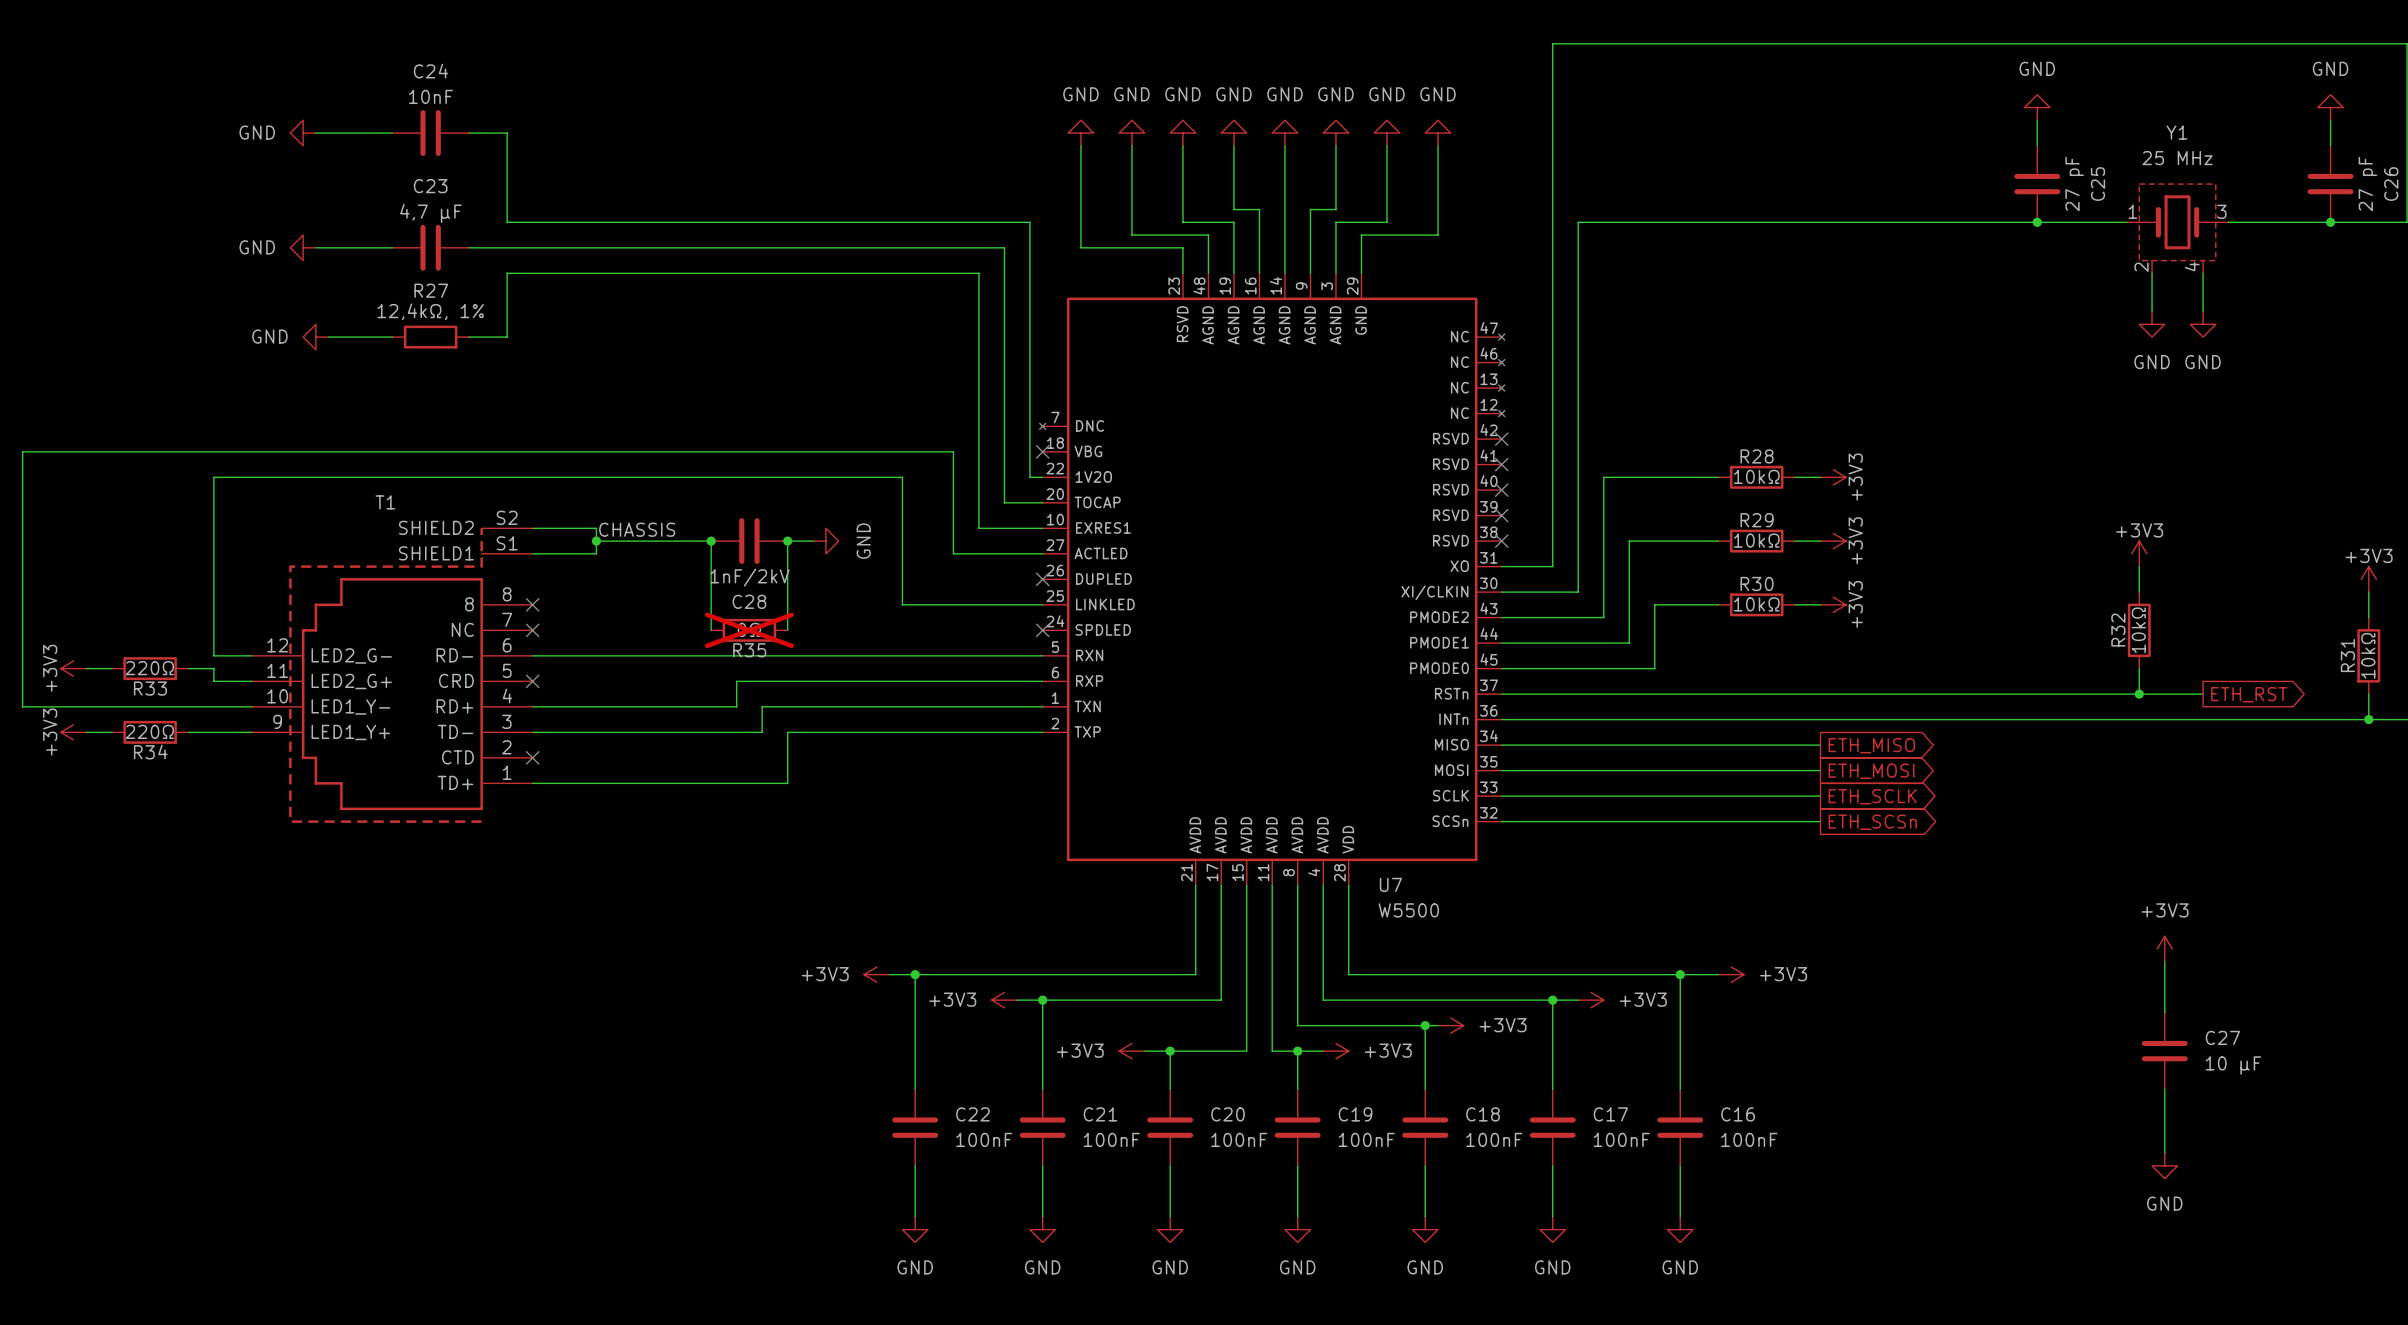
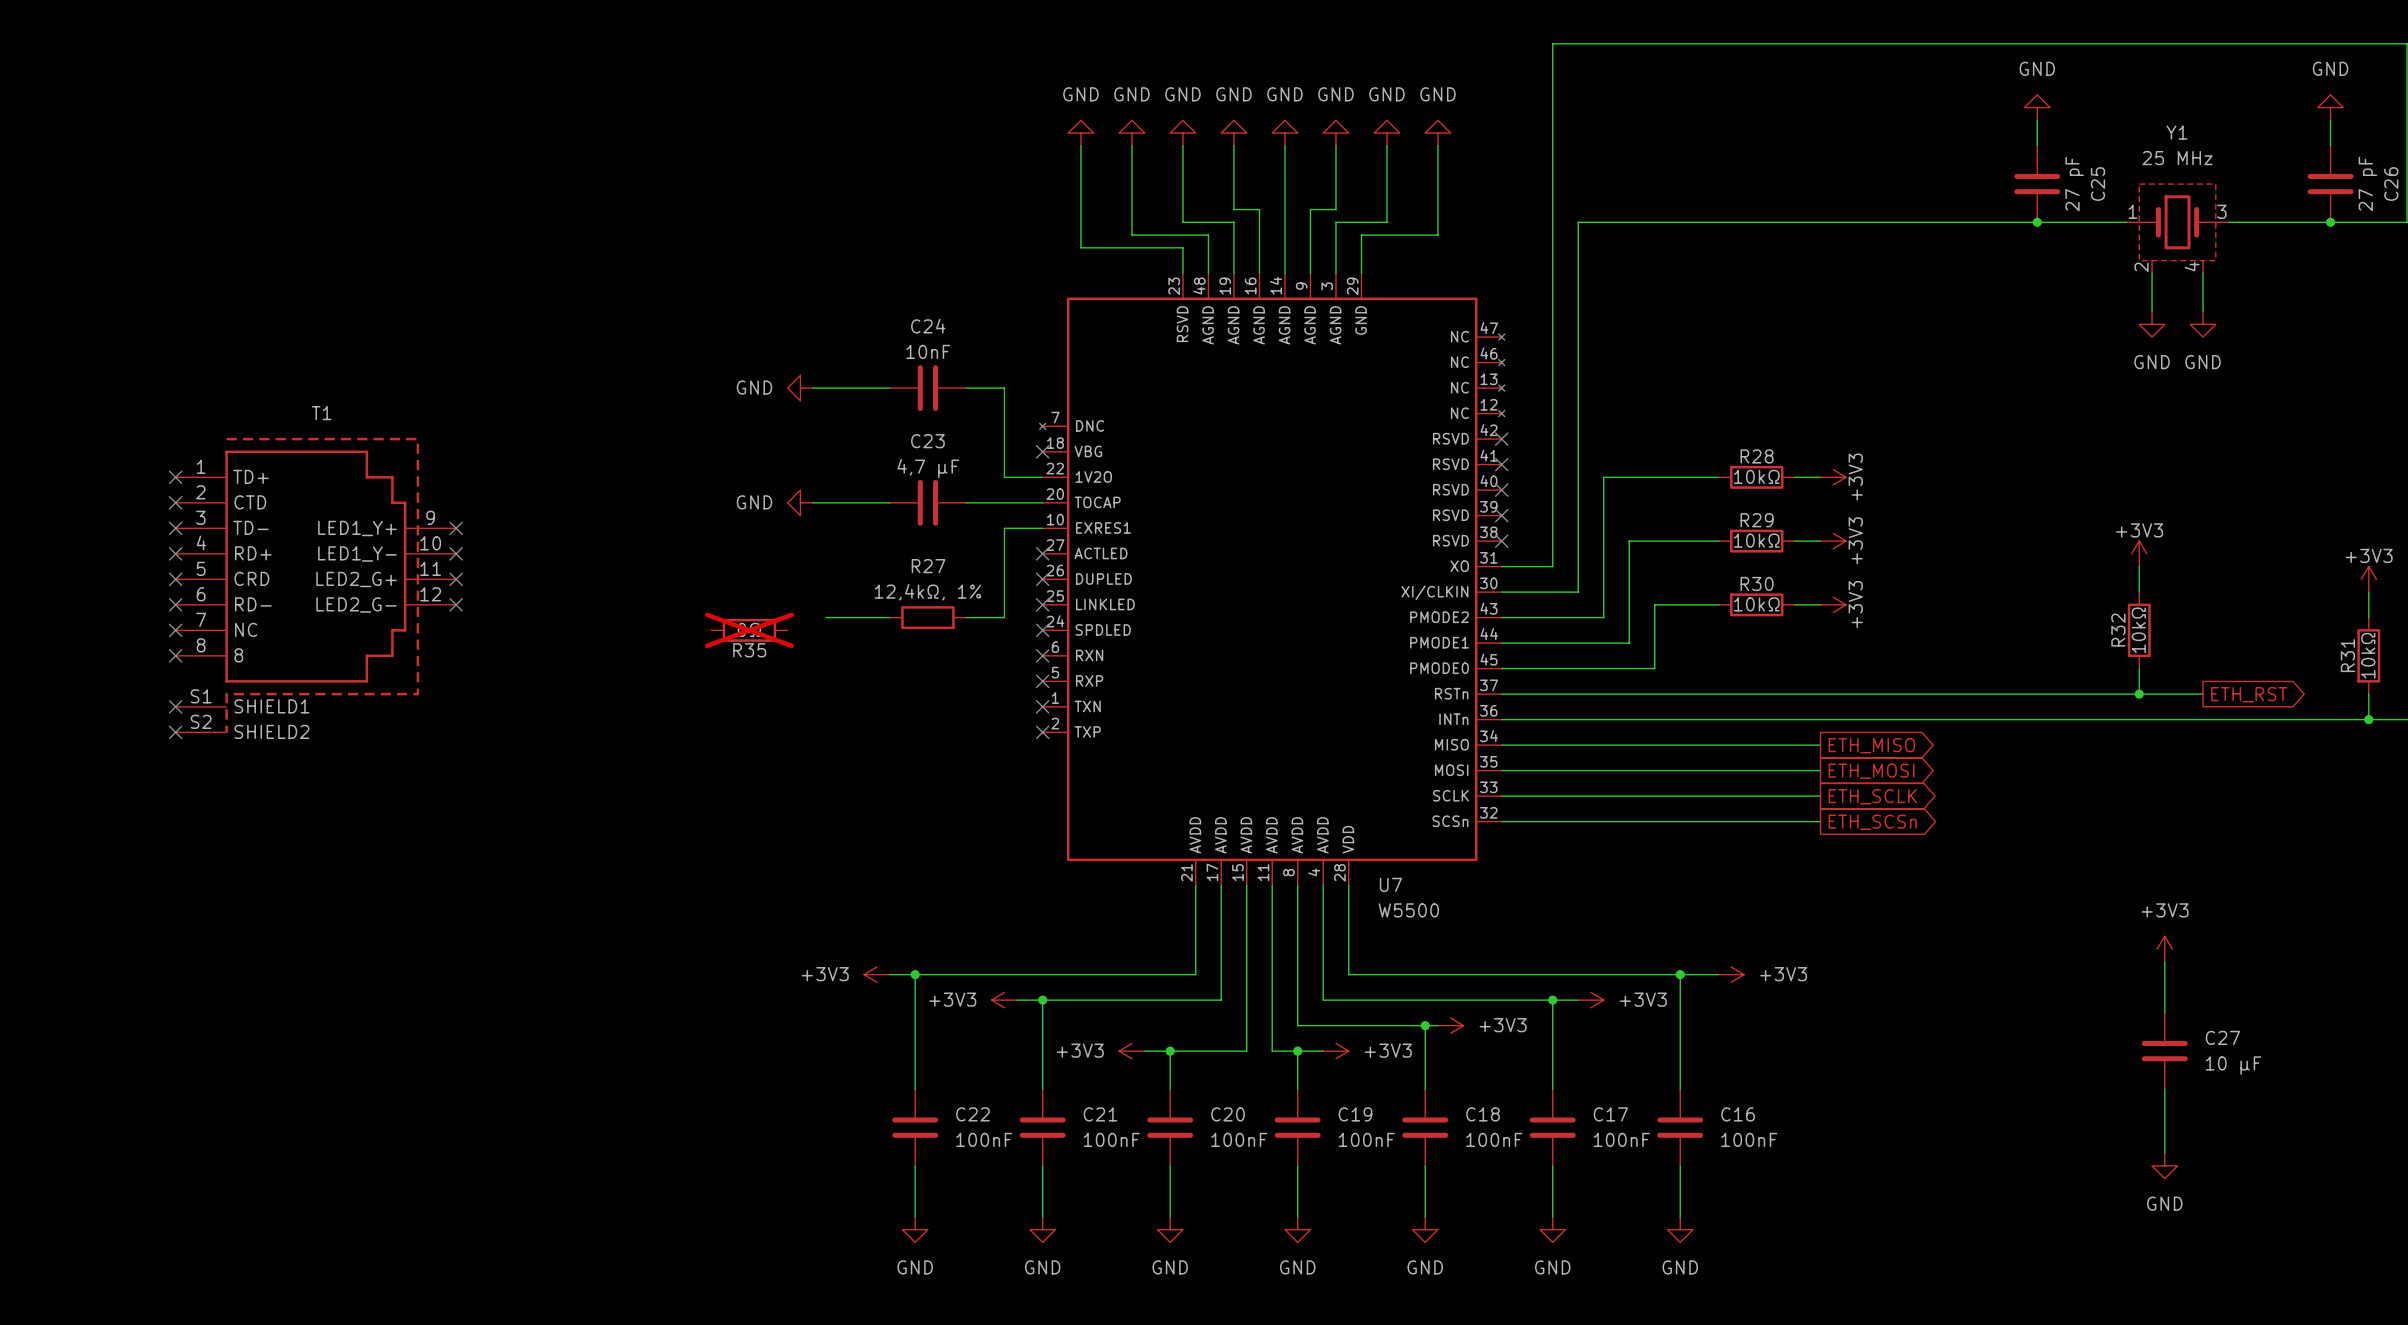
power symbol: GND (303, 133) -> none
wire: (315, 133) (392, 133) -> none
C24 position: (430, 133) -> (927, 388)
wire: (468, 133) (507, 133) (507, 222) (1029, 222) (1029, 477) -> none
power symbol: GND (303, 247) -> none
wire: (315, 247) (392, 247) -> none
C23 position: (430, 247) -> (927, 502)
wire: (468, 247) (1004, 247) (1004, 388) -> (966, 388) (1004, 388)
R27 name position: R27 (431, 290) -> R27 (928, 566)
power symbol: GND (315, 337) -> none
wire: (328, 337) (392, 337) -> none
R27 position: (430, 337) -> (927, 617)
wire: (468, 337) (507, 337) (507, 273) (978, 273) (978, 528) (1004, 528) -> (966, 617) (1004, 617) (1004, 528)
power symbol: none -> GND (800, 388)
wire: none -> (813, 388) (889, 388)
no-connect mark: none -> (175, 477)
wire: (1004, 477) (1004, 502) -> (1004, 477) (1029, 477)
no-connect mark: none -> (175, 502)
wire: none -> (813, 502) (889, 502)
wire: none -> (966, 502) (1004, 502)
no-connect mark: none -> (175, 528)
no-connect mark: none -> (456, 528)
wire: (532, 528) (596, 528) (596, 553) (532, 553) -> none
label: CHASSIS (637, 529) -> none
wire: (596, 541) (711, 541) (711, 630) -> none
junction: (596, 541) -> none
junction: (711, 541) -> none
C28: 1nF/2kV (749, 541) -> none
junction: (787, 541) -> none
wire: (813, 541) (787, 541) (787, 630) -> none
power symbol rotation: 0° (825, 541) -> 180° (800, 502)
power symbol position: GND (825, 541) -> GND (800, 502)
no-connect mark: none -> (175, 553)
no-connect mark: none -> (456, 553)
wire: (1042, 553) (953, 553) (953, 451) (22, 451) (22, 706) (252, 706) -> none
no-connect mark: none -> (1042, 553)
no-connect mark: none -> (175, 579)
no-connect mark: none -> (456, 579)
no-connect mark: none -> (175, 604)
no-connect mark: none -> (456, 604)
no-connect mark: (532, 604) -> none
wire: (1042, 604) (902, 604) (902, 477) (213, 477) (213, 655) (252, 655) -> none
no-connect mark: none -> (1042, 604)
wire: none -> (825, 617) (889, 617)
no-connect mark: none -> (175, 630)
no-connect mark: (532, 630) -> none
U7 pin number: 5 (1055, 647) -> 6 (1055, 647)
no-connect mark: none -> (175, 655)
wire: (532, 655) (1042, 655) -> none
no-connect mark: none -> (1042, 655)
power symbol: +3V3 (73, 668) -> none
wire: (86, 668) (111, 668) -> none
R33: 220Ω (150, 668) -> none
wire: (188, 668) (213, 668) (213, 681) (252, 681) -> none
U7 pin number: 6 (1055, 672) -> 5 (1055, 672)
T1 rotation: 0° (386, 674) -> 180° (322, 585)
no-connect mark: (532, 681) -> none
wire: (1042, 681) (736, 681) (736, 706) (532, 706) -> none
no-connect mark: none -> (1042, 681)
no-connect mark: none -> (175, 706)
wire: (1042, 706) (762, 706) (762, 732) (532, 732) -> none
no-connect mark: none -> (1042, 706)
power symbol: +3V3 (73, 732) -> none
wire: (86, 732) (111, 732) -> none
R34: 220Ω (150, 732) -> none
no-connect mark: none -> (175, 732)
wire: (1042, 732) (787, 732) (787, 783) (532, 783) -> none
no-connect mark: none -> (1042, 732)
no-connect mark: (532, 757) -> none

